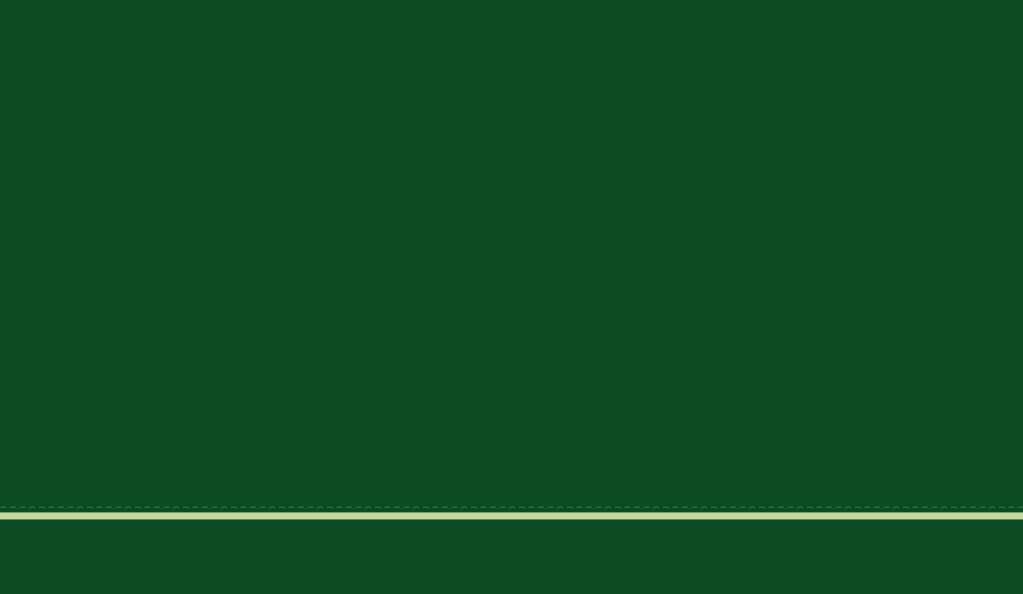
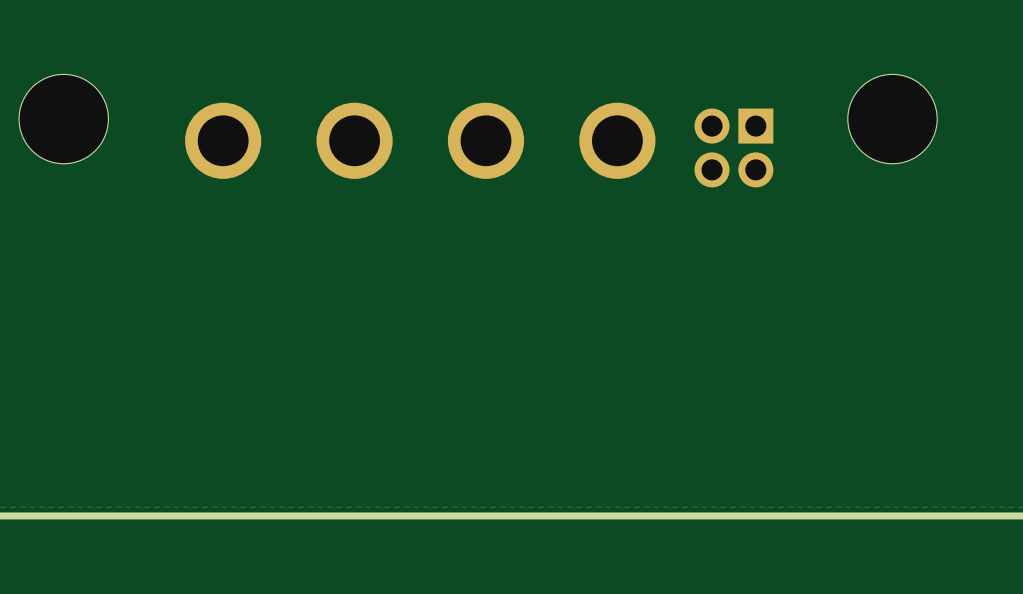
part: none -> (478, 130)

